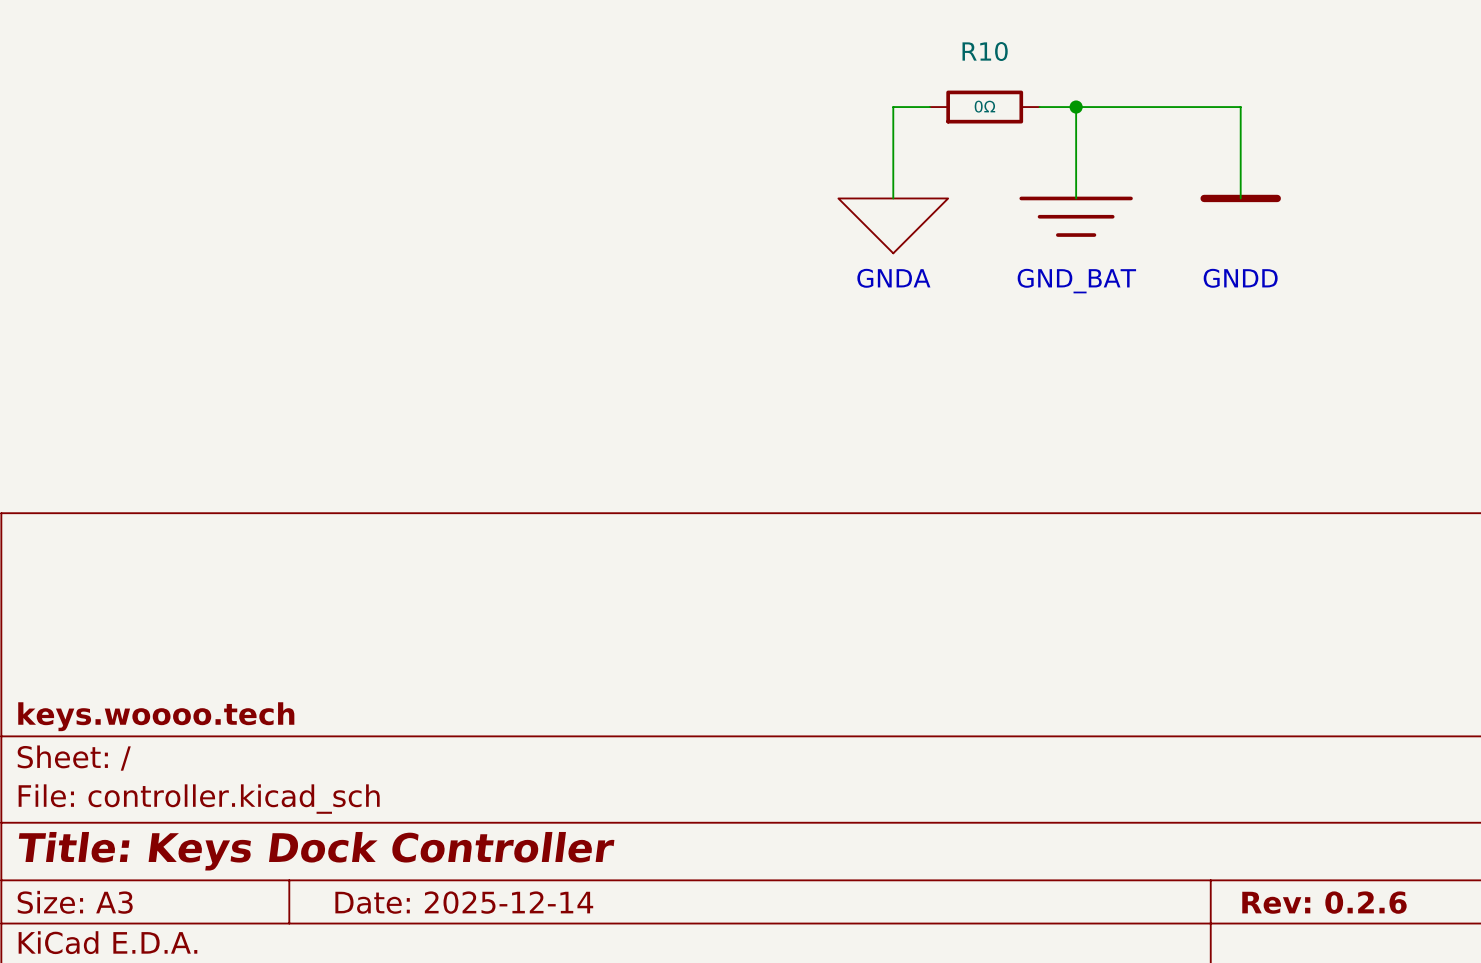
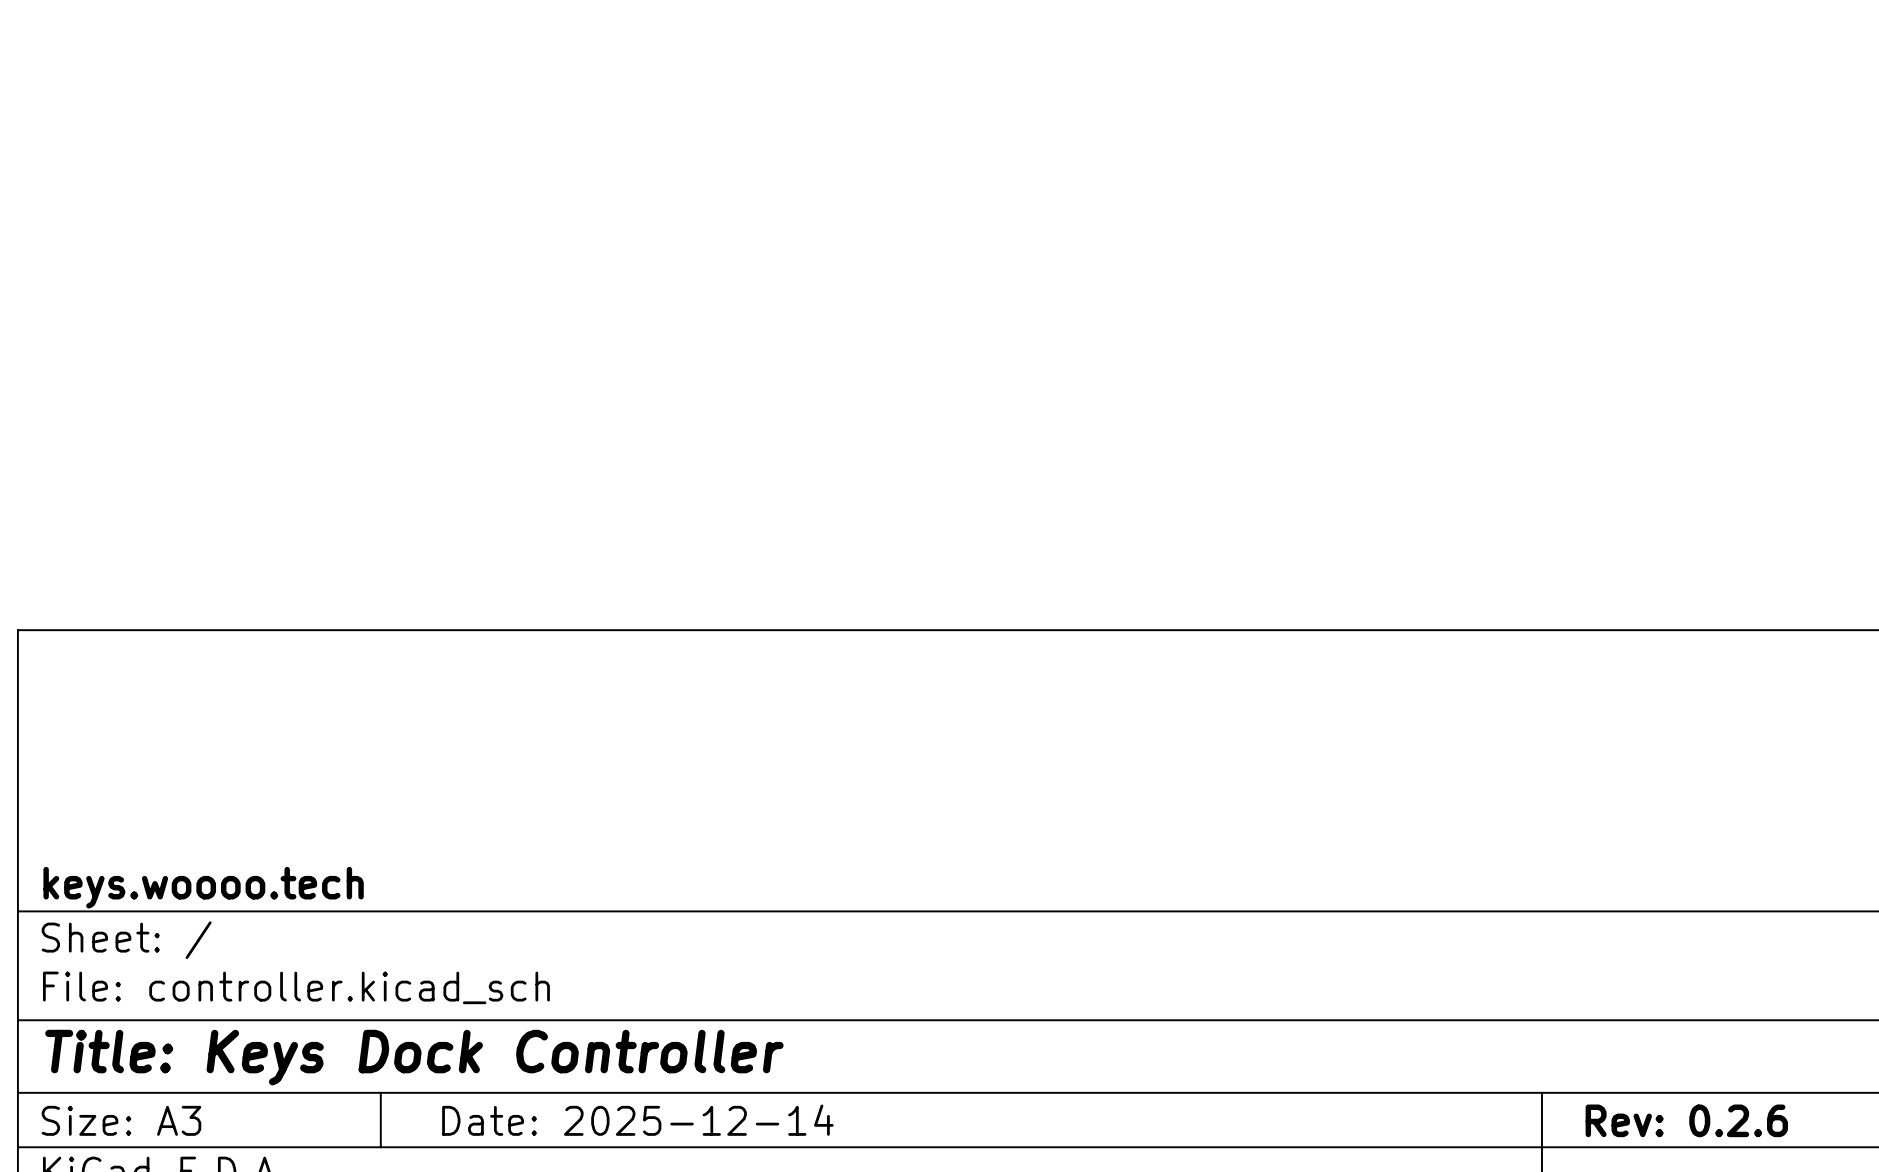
wire: (929, 107) (893, 107) (893, 198) -> none
R10: 0Ω (984, 107) -> none
wire: (1039, 107) (1240, 107) (1240, 198) -> none
wire: (1076, 107) (1076, 198) -> none
junction: (1076, 107) -> none
power symbol: (1240, 198) -> none
power symbol: (1076, 216) -> none
power symbol: (893, 225) -> none
text: GNDA (893, 278) -> none
text: GNDD (1240, 278) -> none
text: GND_BAT (1076, 281) -> none

